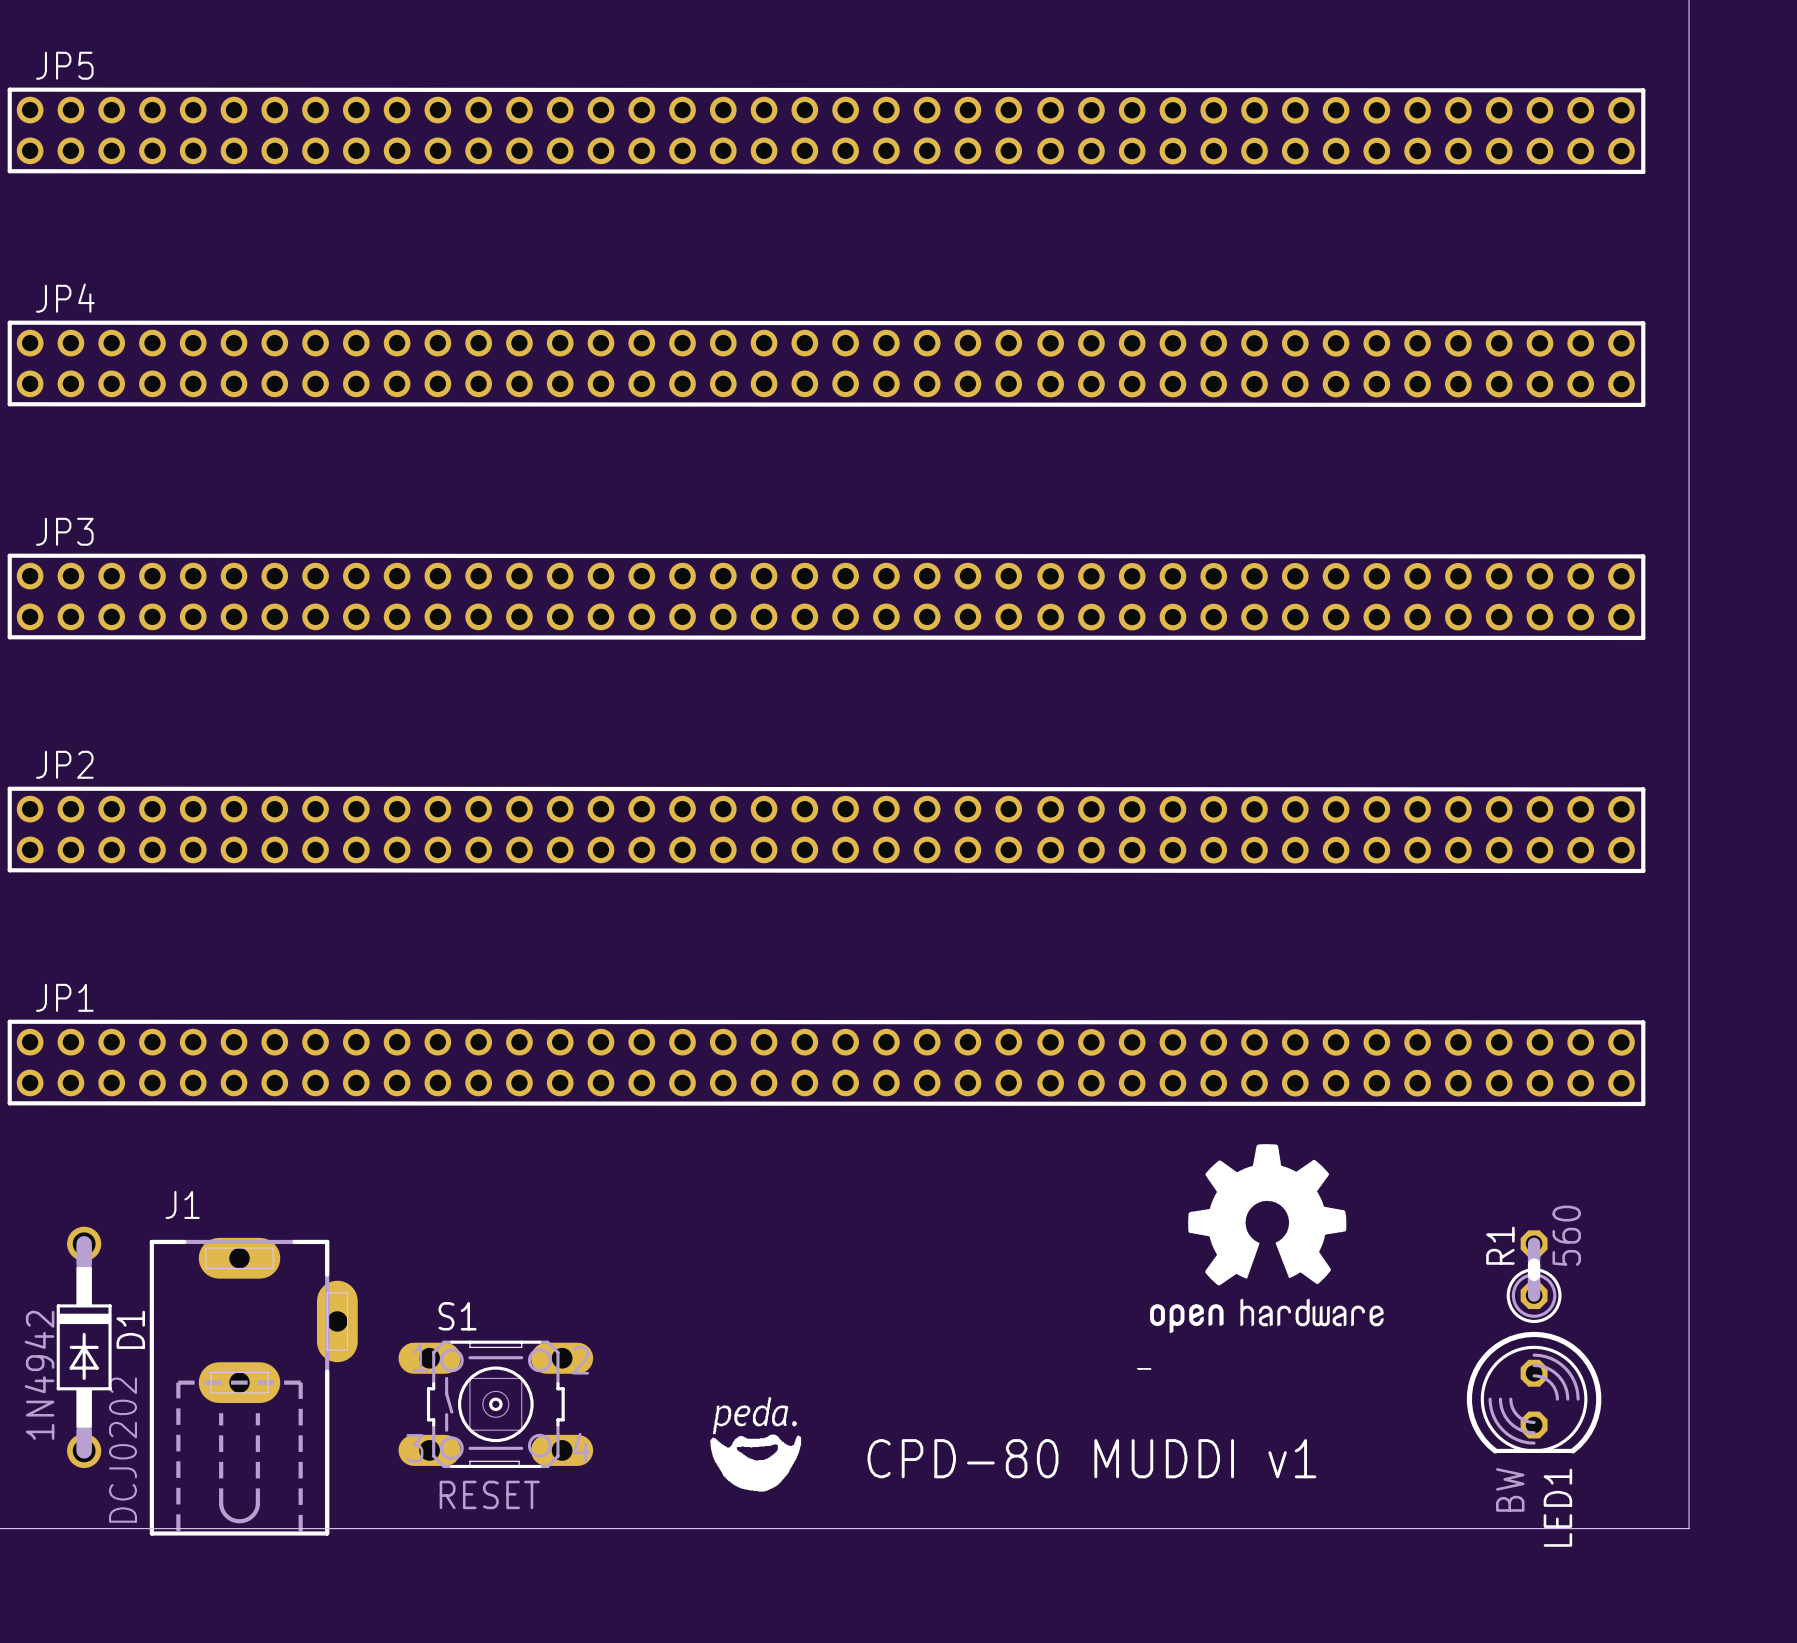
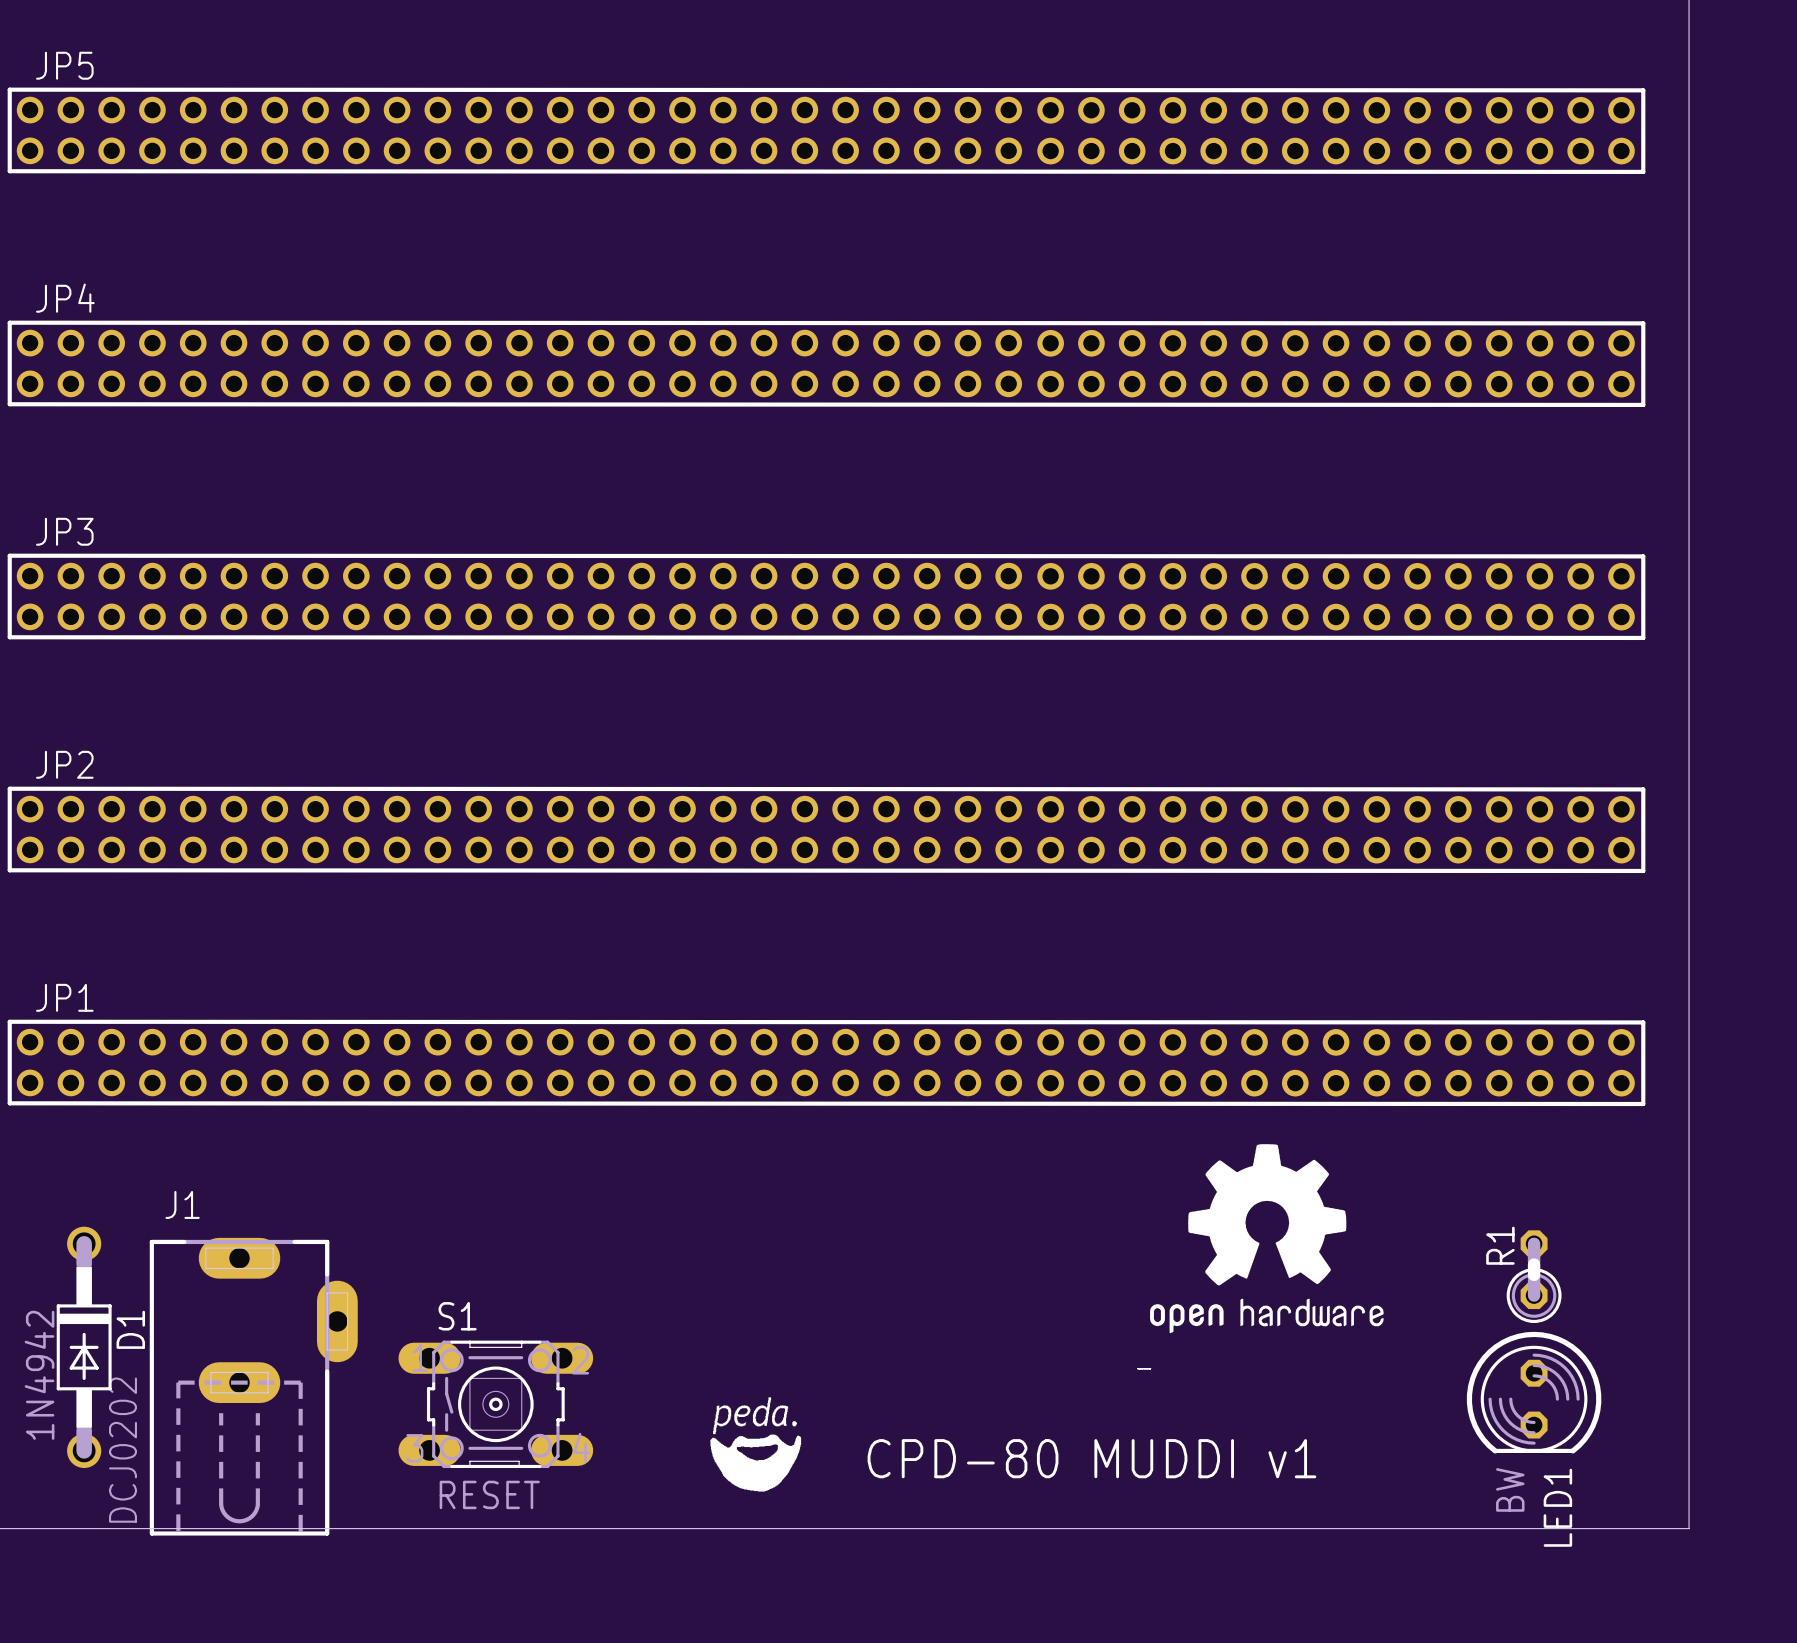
R1 value: 560 (1566, 1235) -> none

